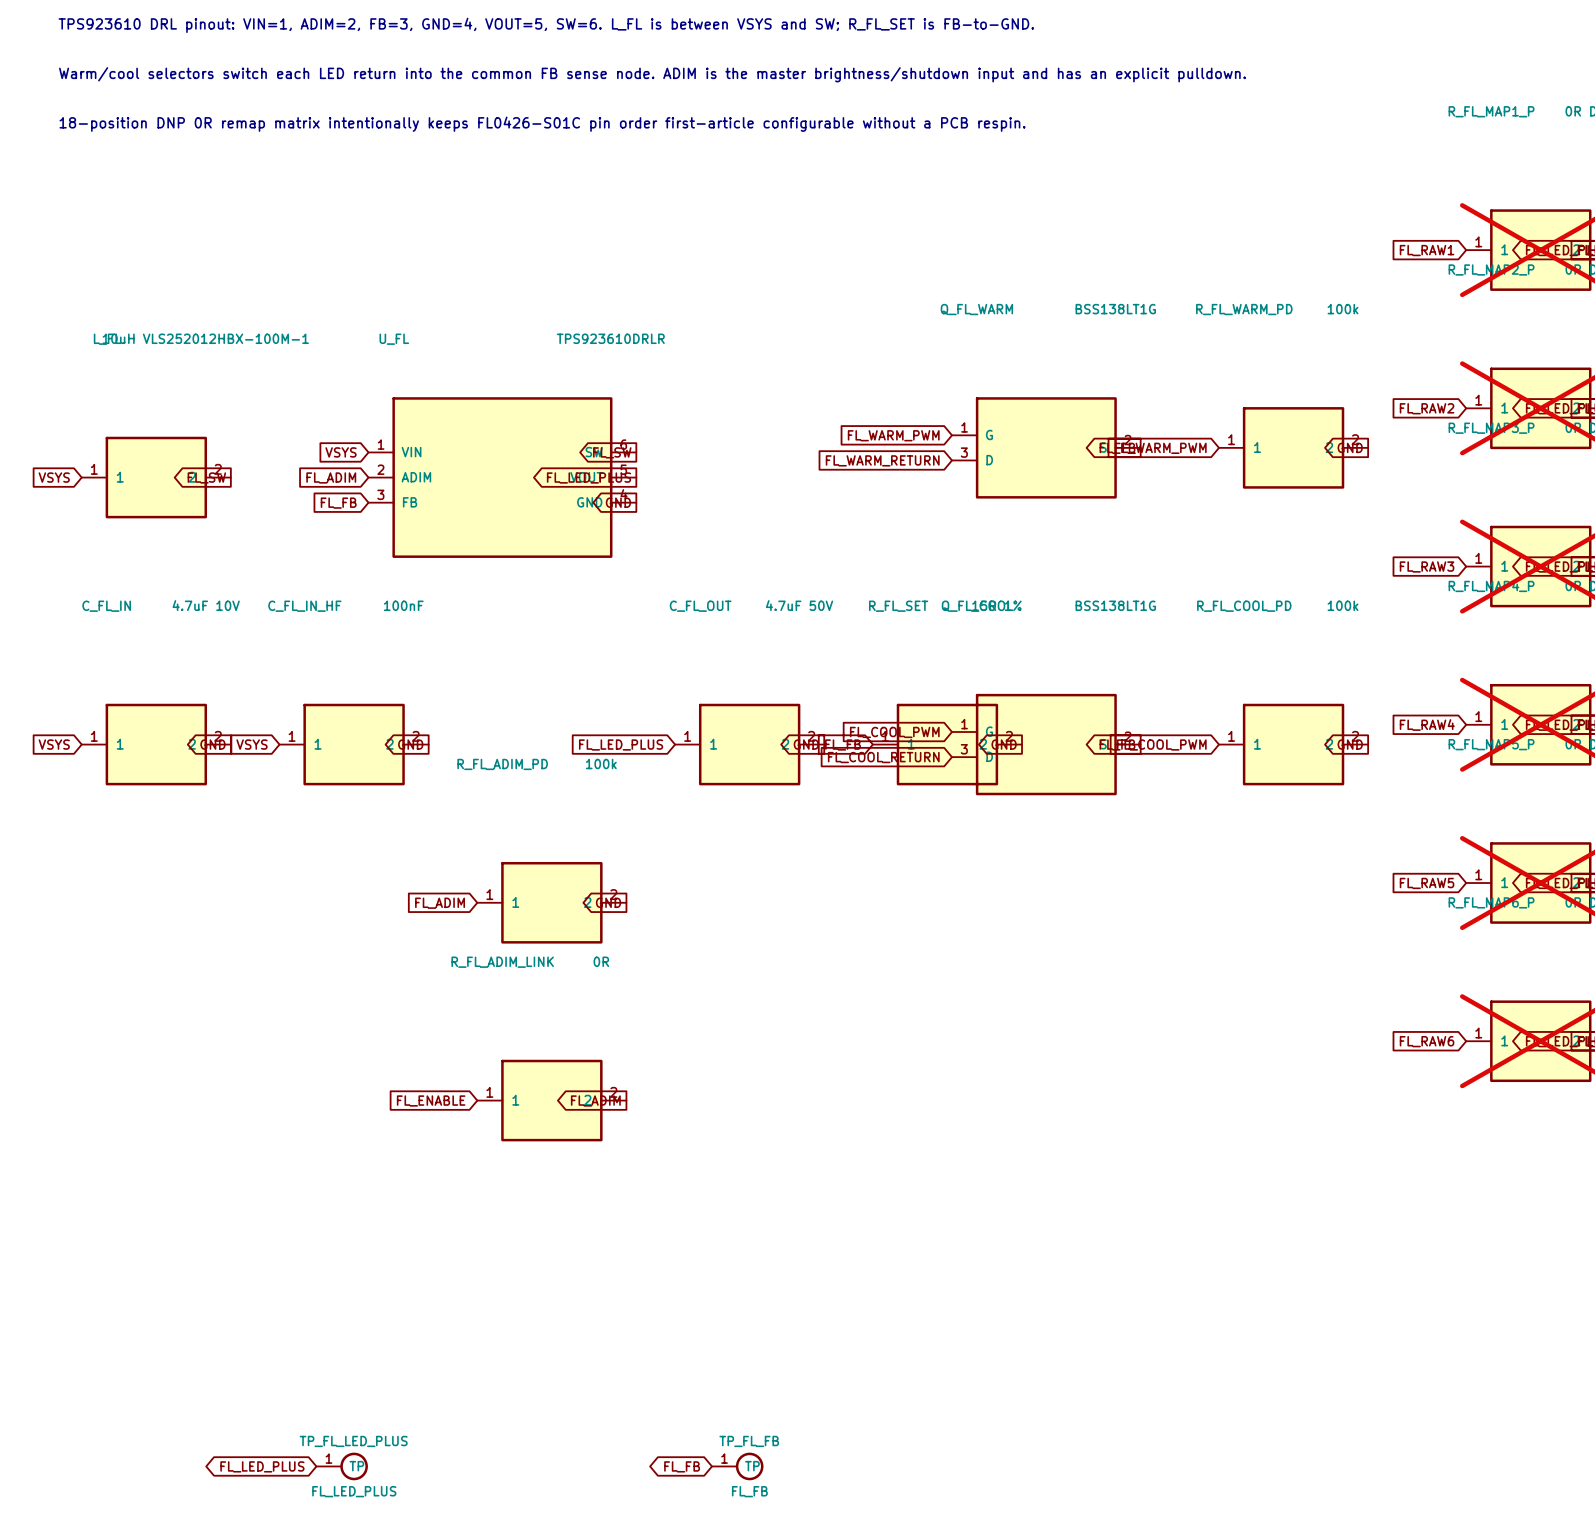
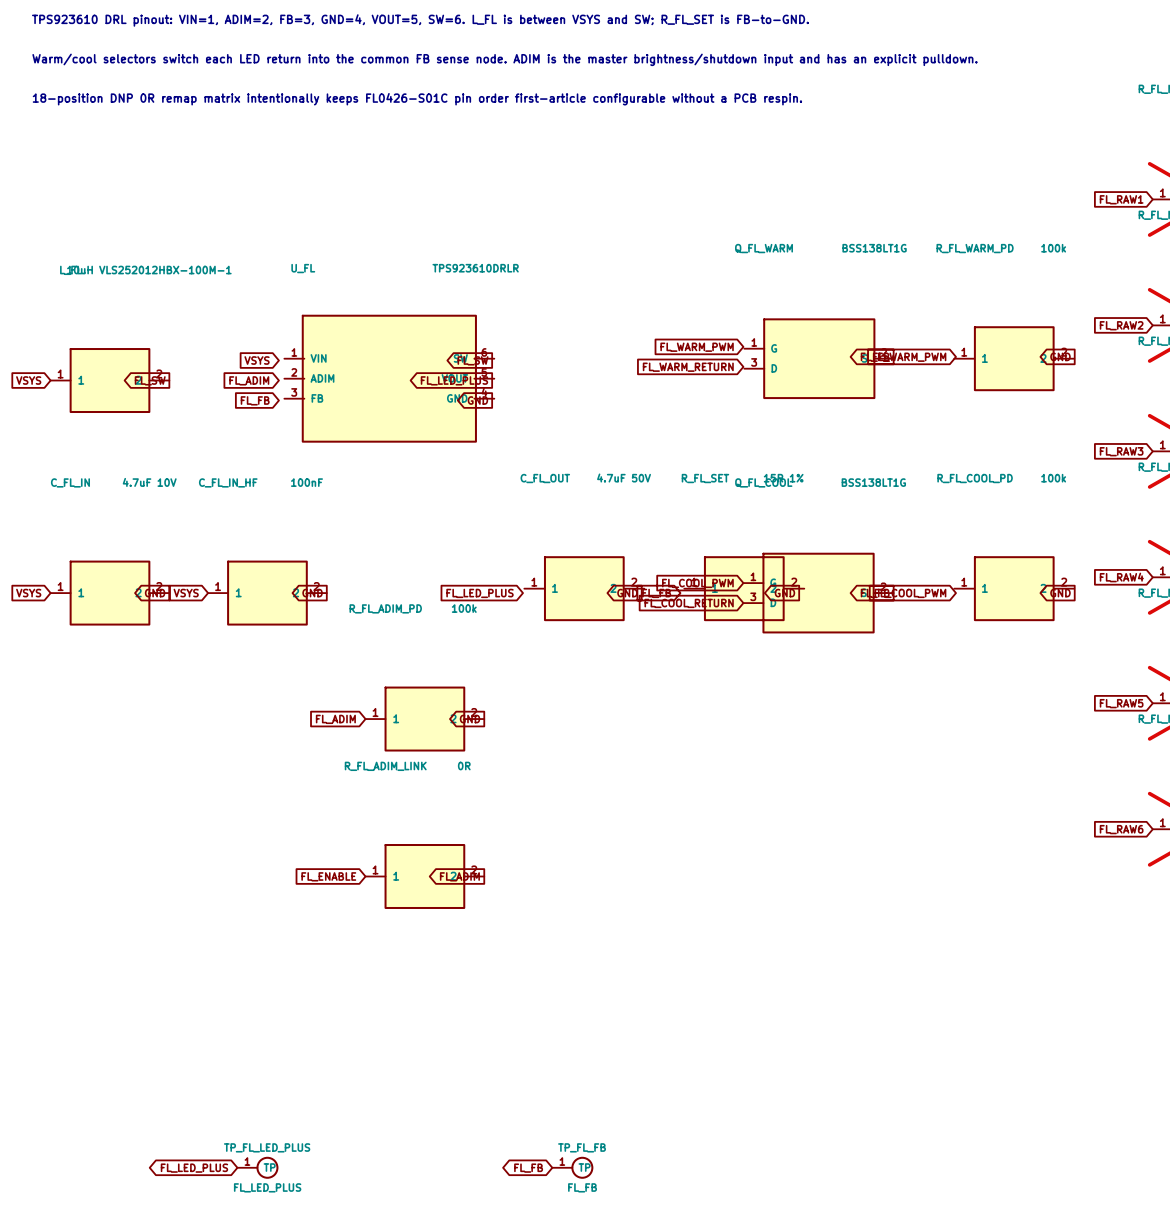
U_FL symbol: [368, 397, 637, 558] -> [284, 314, 495, 443]
Q_FL_WARM symbol: [951, 397, 1141, 499] -> [744, 318, 895, 400]
R_FL_WARM_PD symbol: [1218, 407, 1369, 489] -> [954, 326, 1075, 392]
C_FL_OUT symbol: [675, 703, 825, 786] -> [524, 556, 645, 622]
R_FL_SET symbol: [872, 703, 1023, 786] -> [684, 556, 805, 622]
R_FL_COOL_PD symbol: [1218, 703, 1369, 786] -> [954, 556, 1075, 622]

